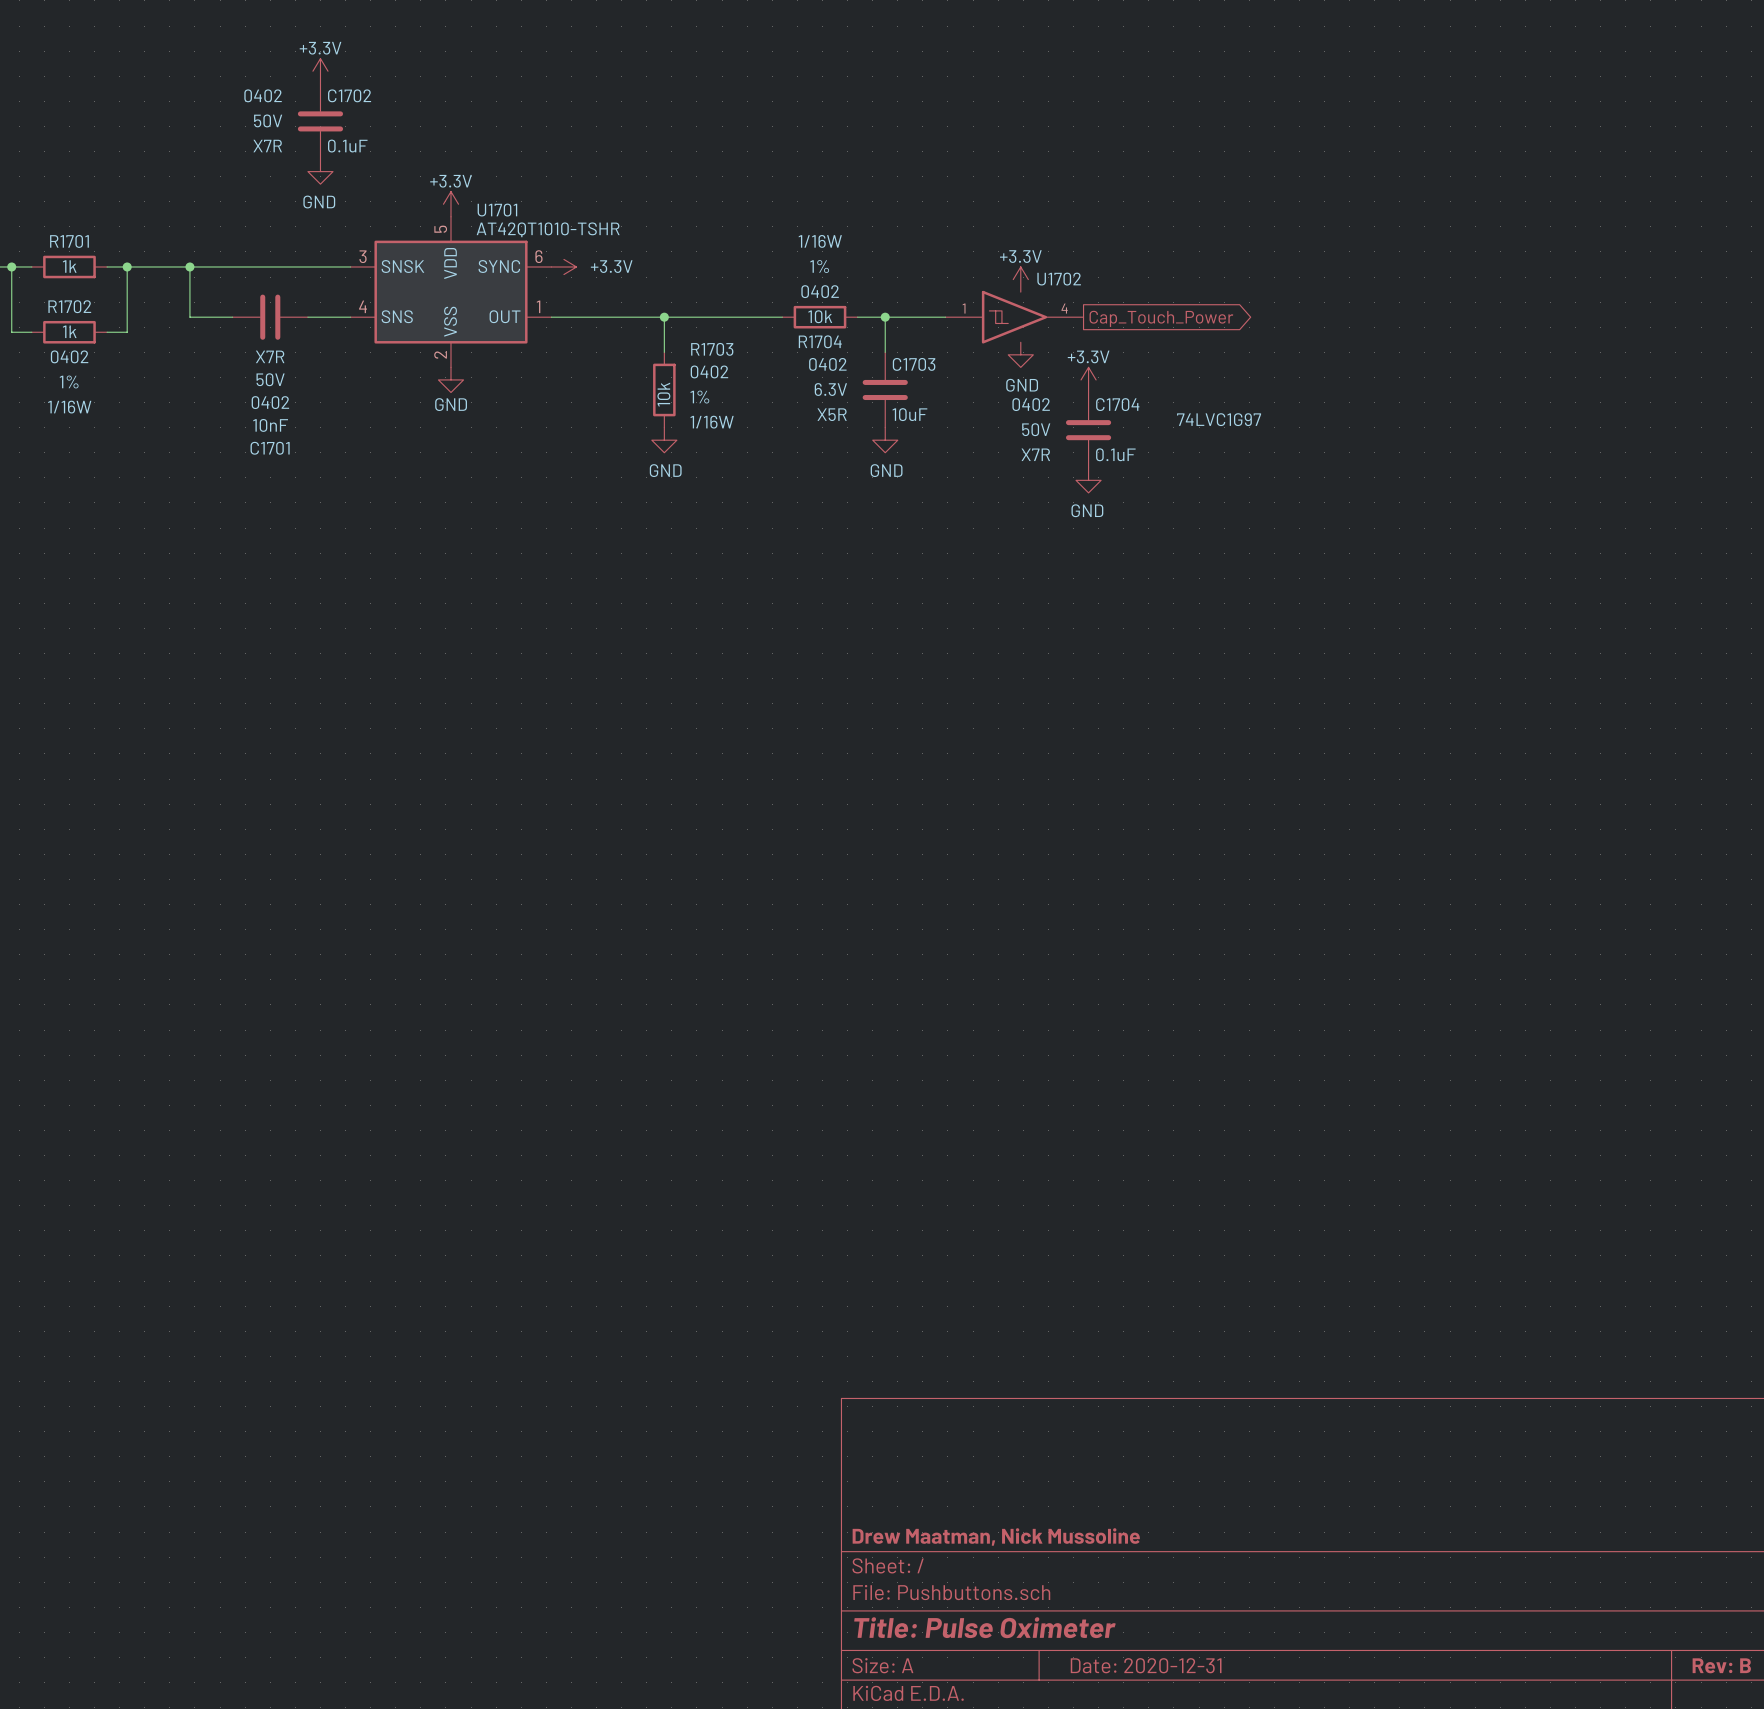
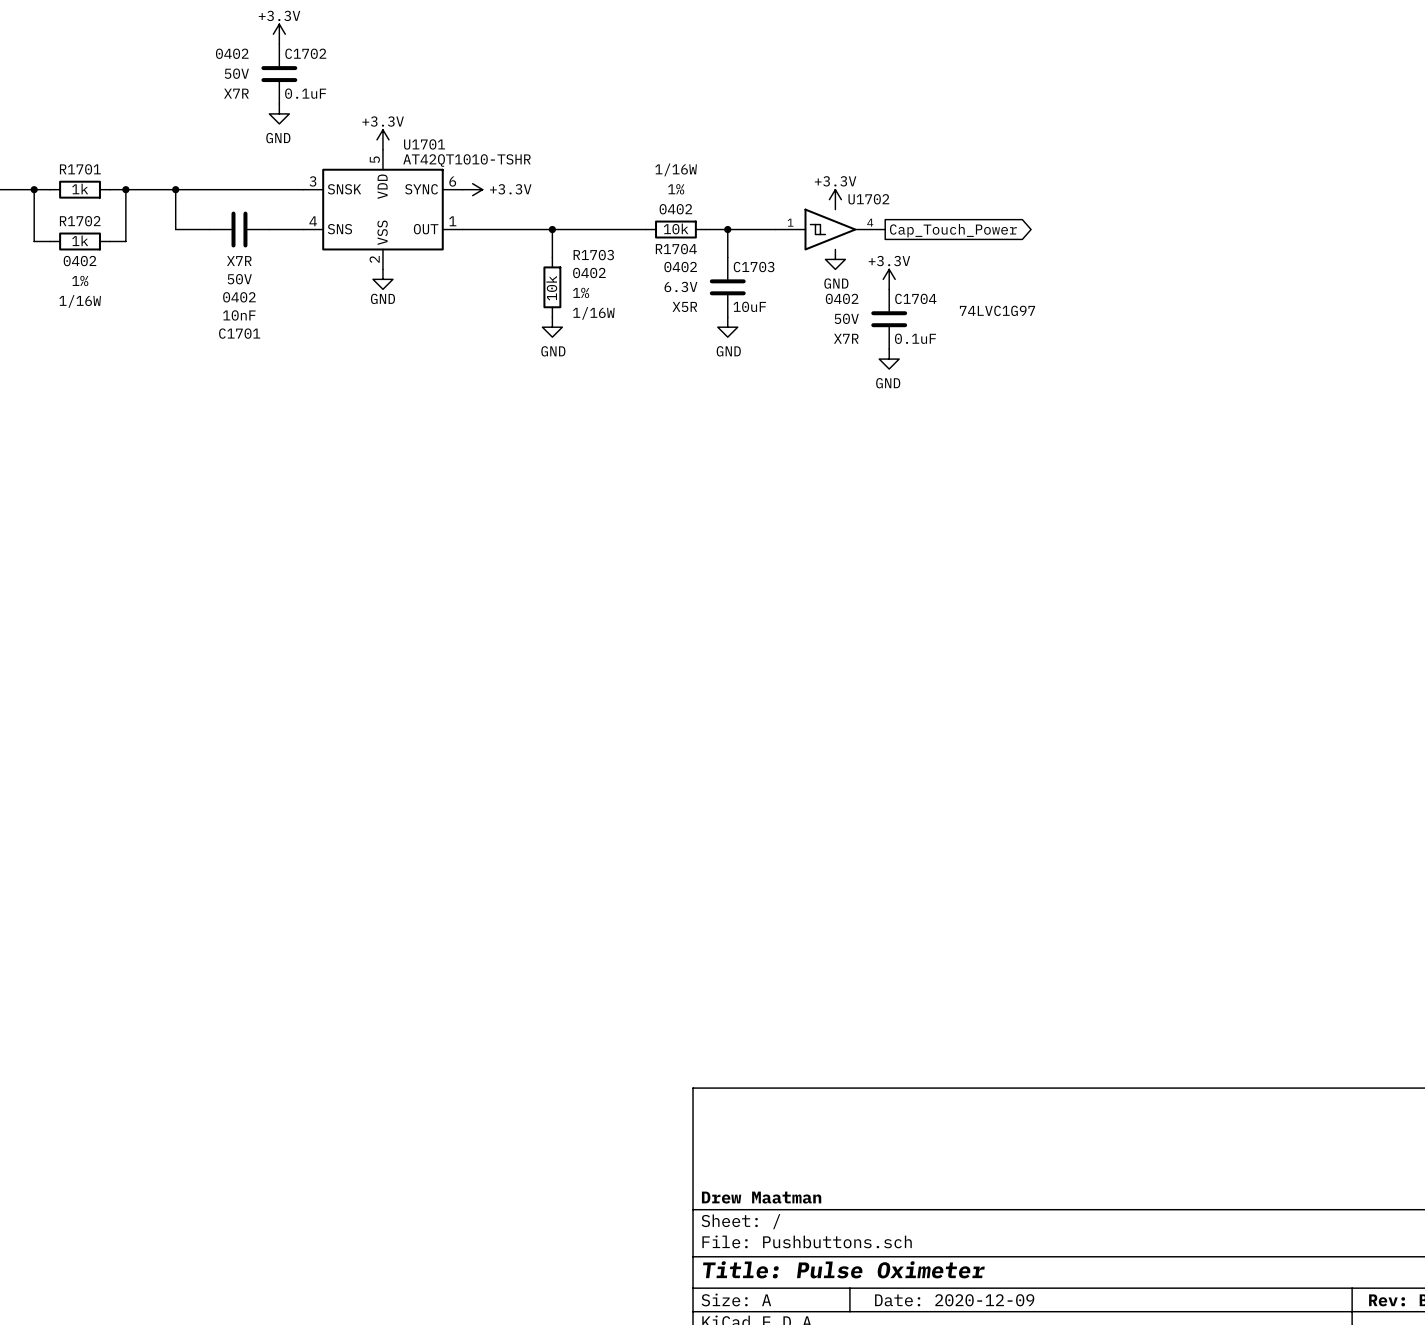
title block: Drew Maatman, Nick Mussoline (996, 1536) -> Drew Maatman (761, 1197)
title block: Date: 2020-12-31 (1146, 1665) -> Date: 2020-12-09 (954, 1300)

